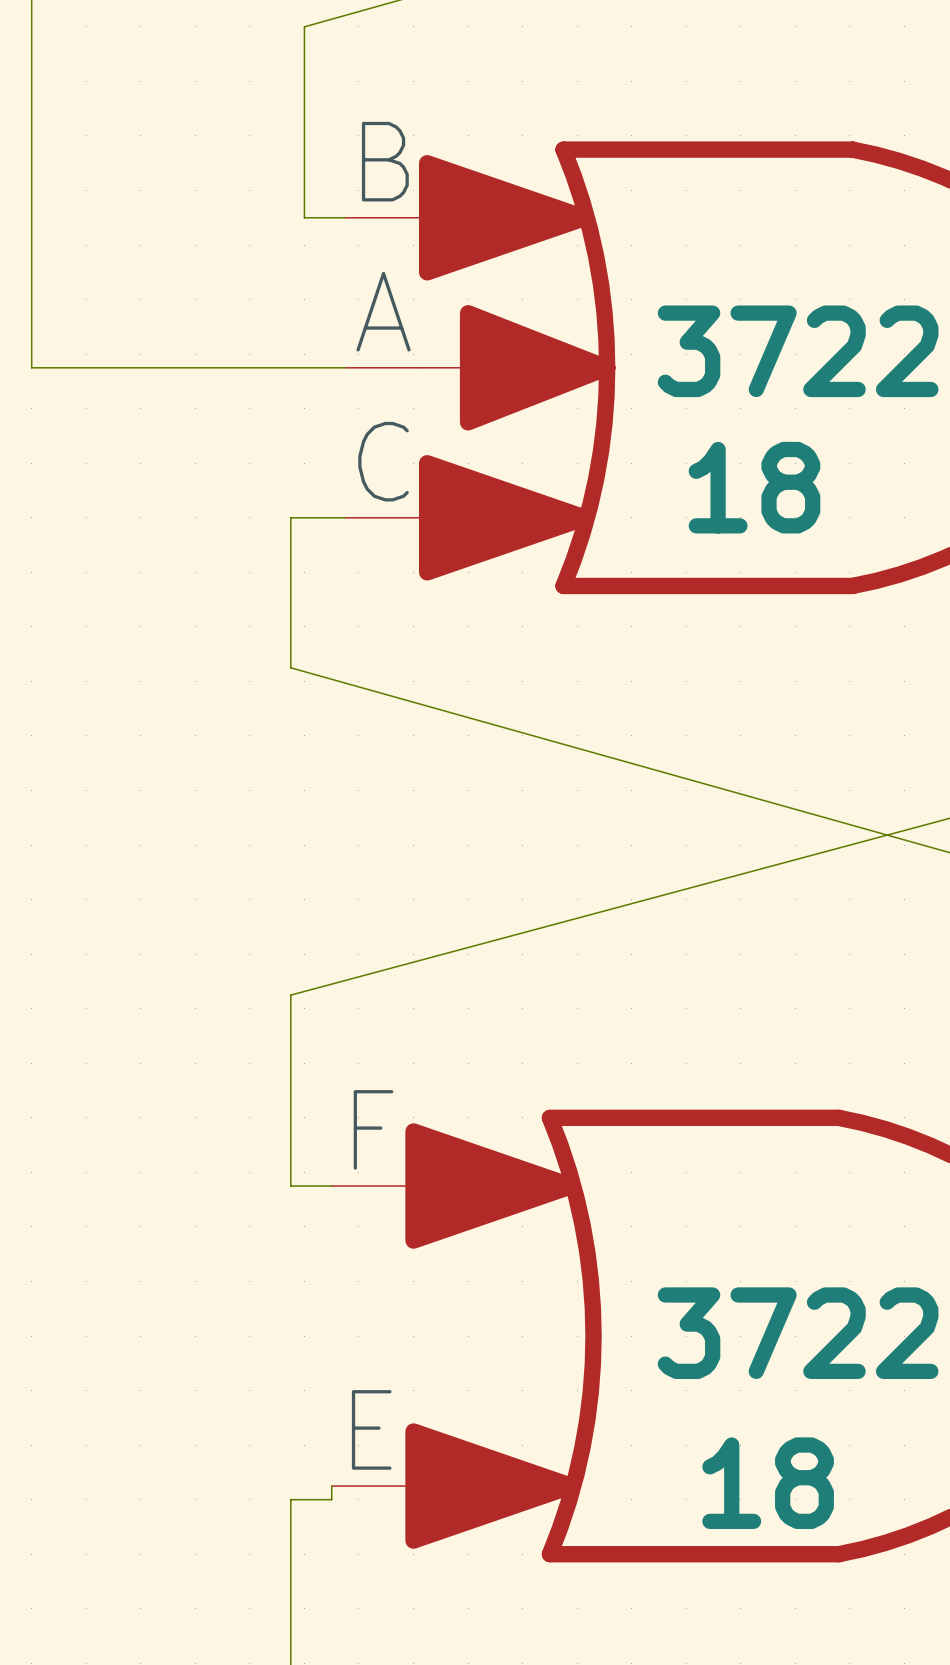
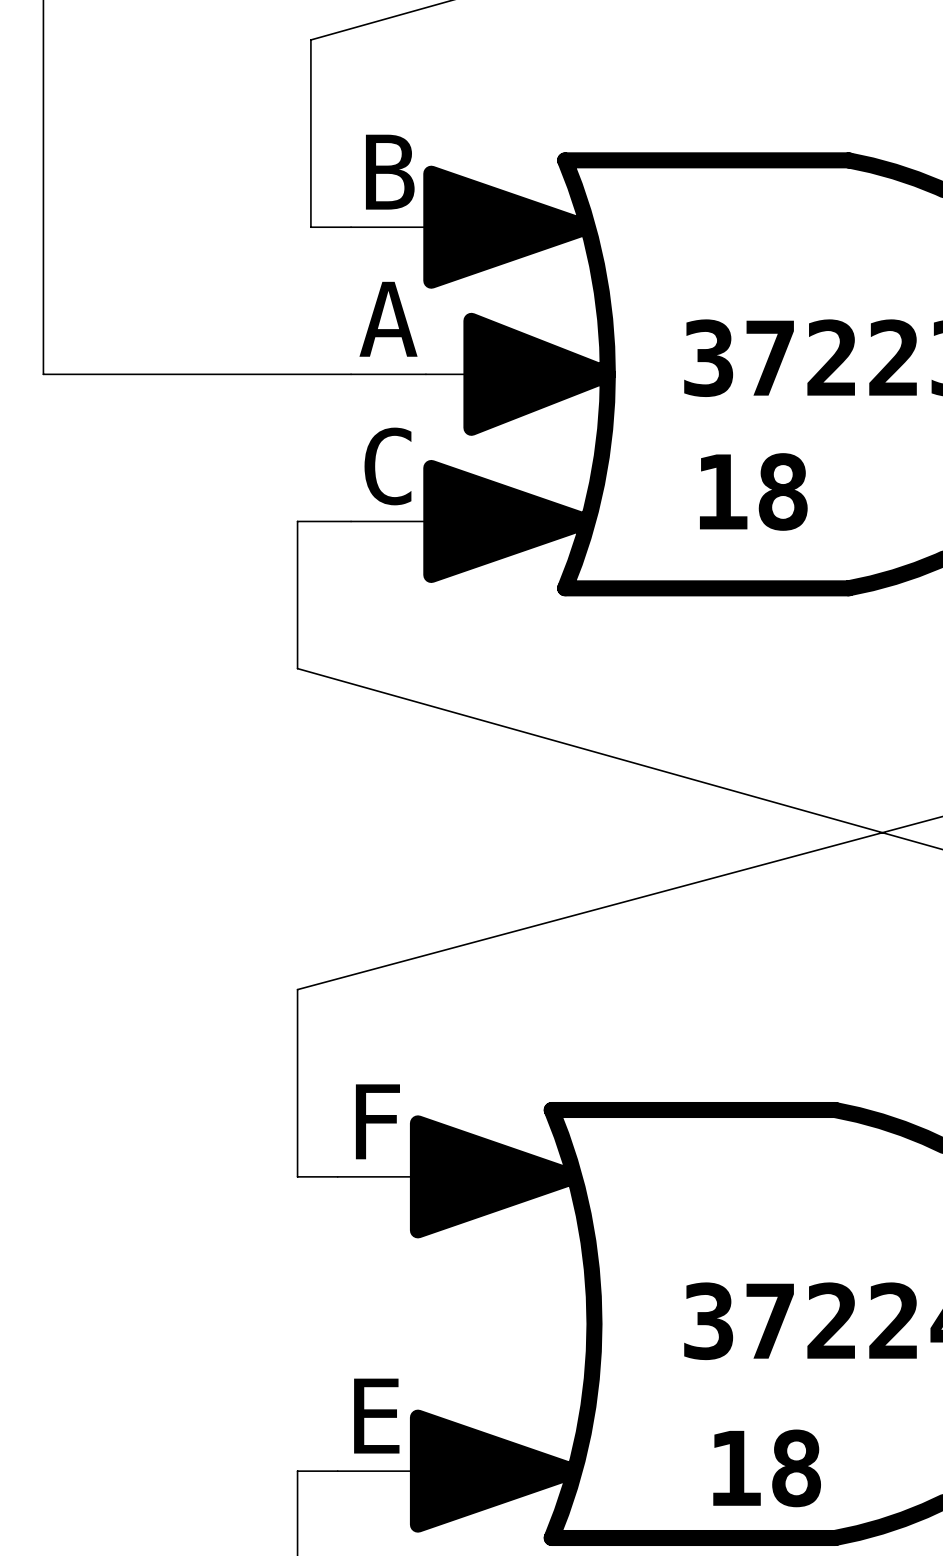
wire: (331, 1486) (331, 1499) (290, 1499) -> (337, 1471) (297, 1471) (297, 1484)

